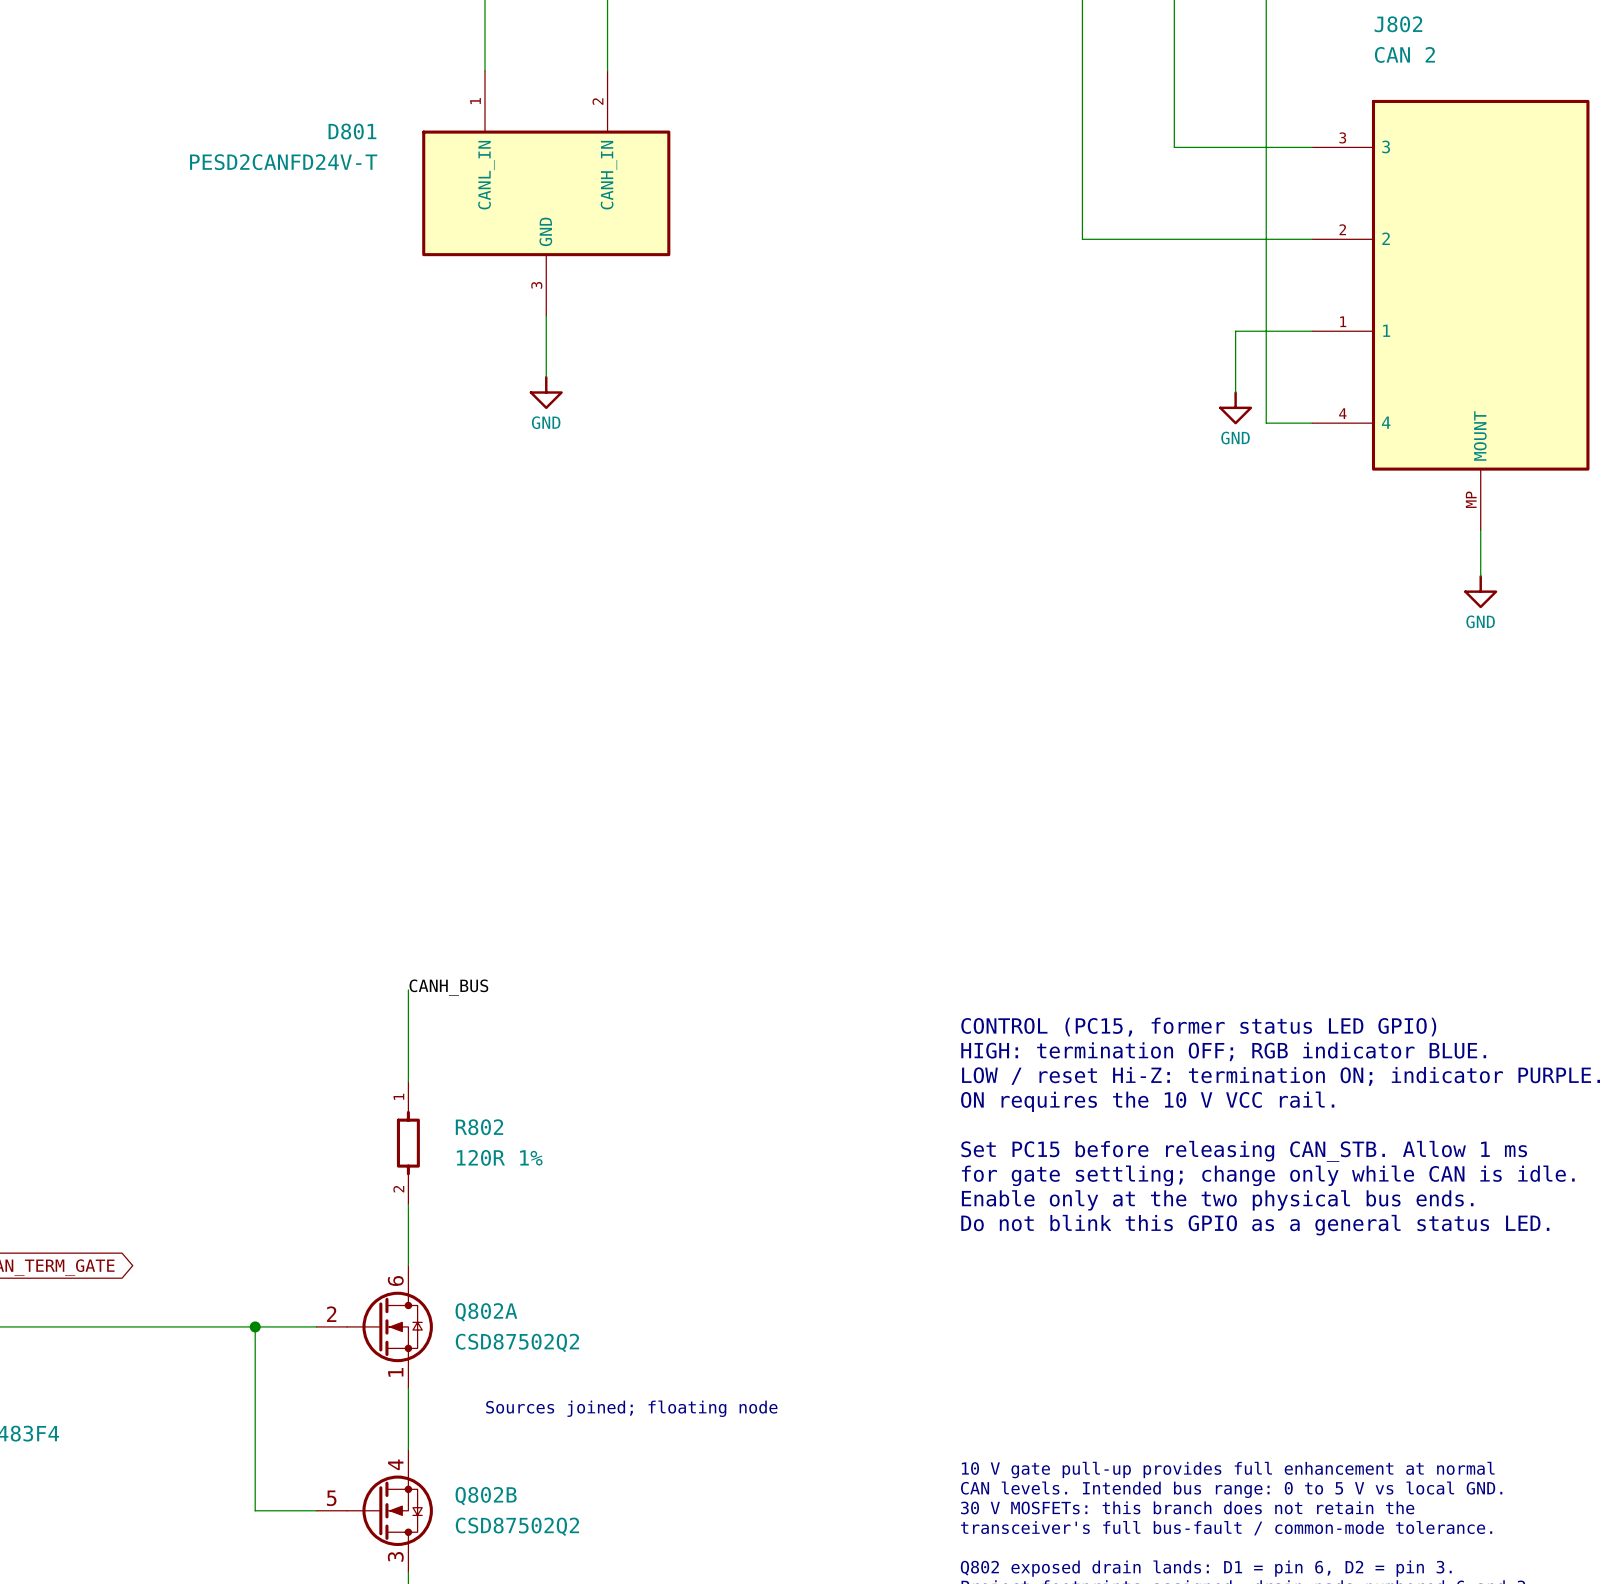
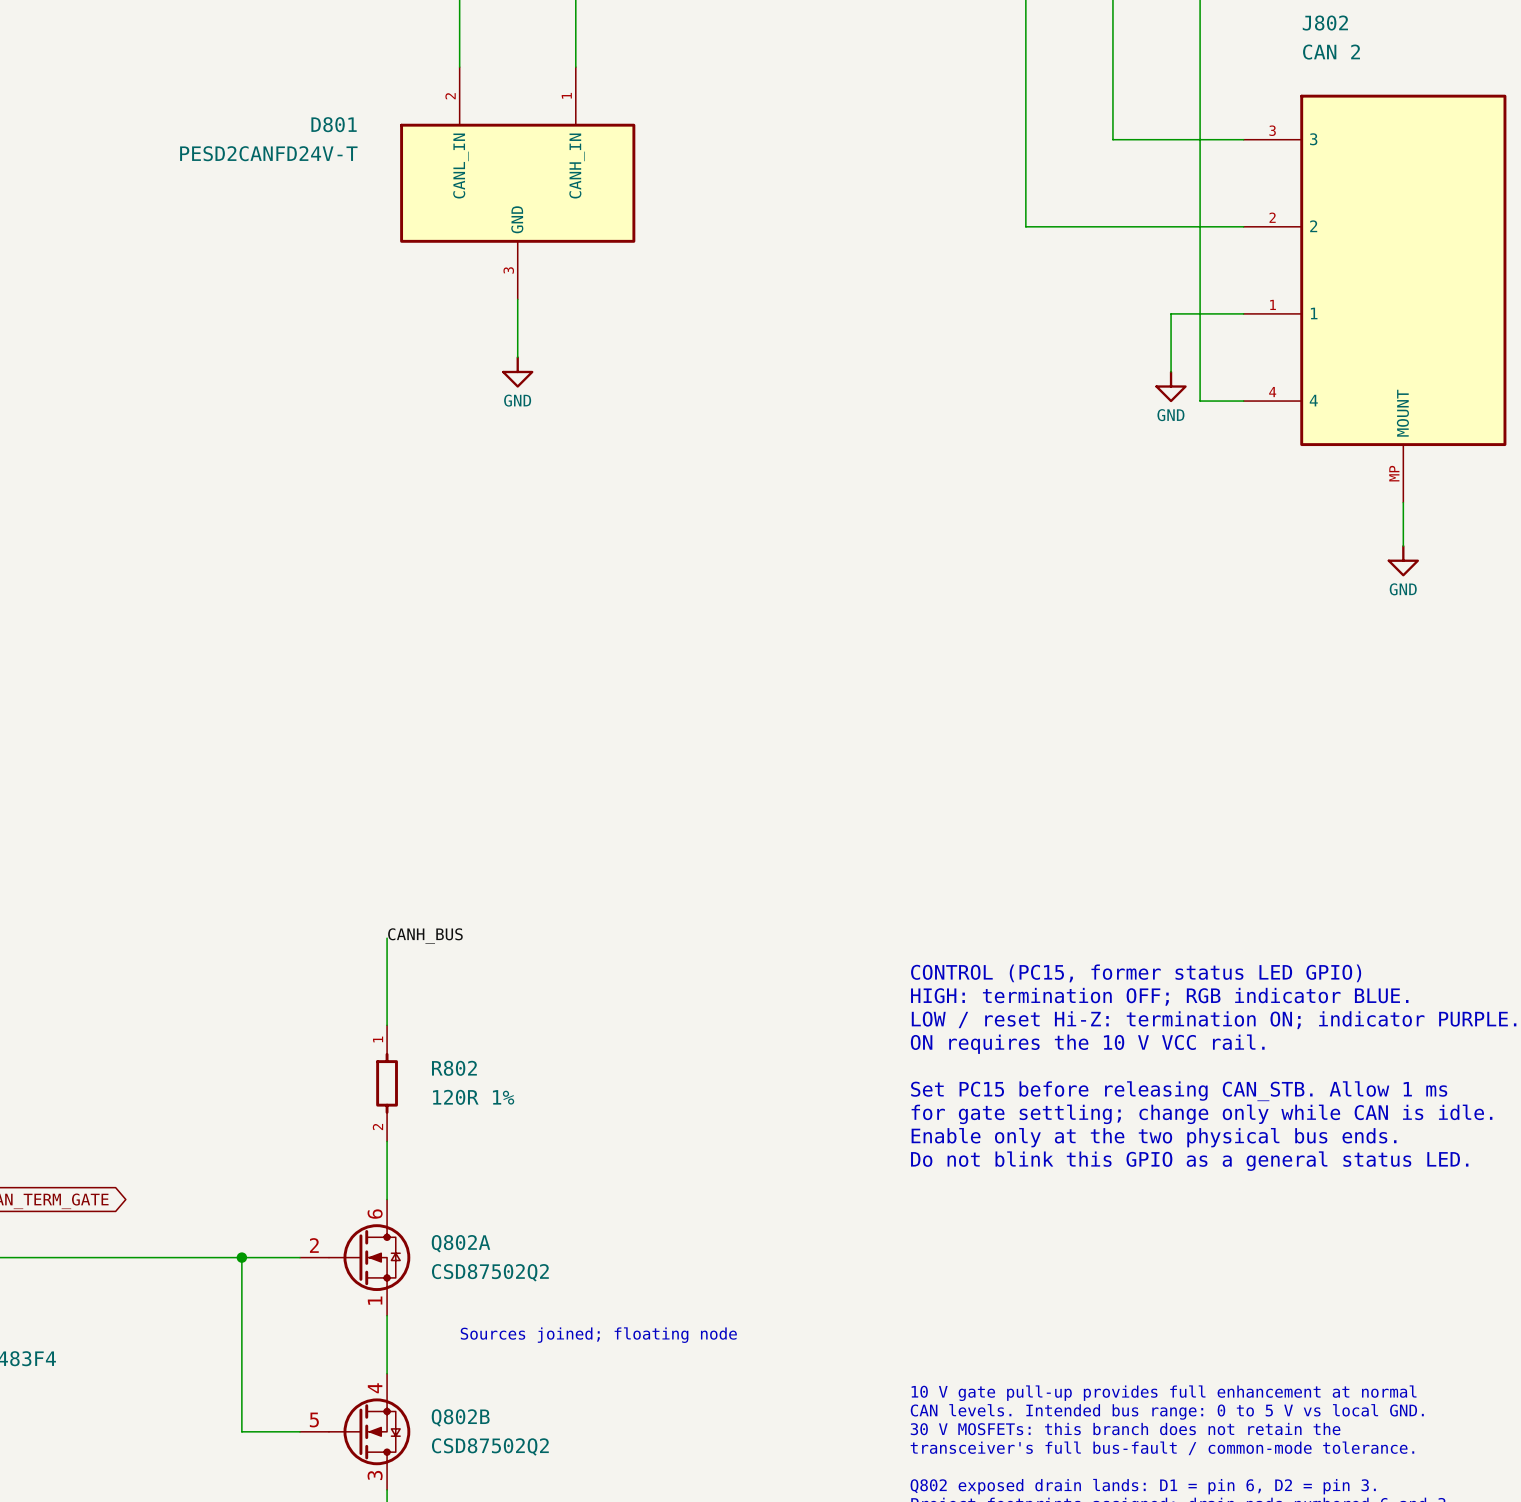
D801 pin number: 1 (475, 101) -> 2 (450, 96)
D801 pin number: 2 (597, 101) -> 1 (566, 95)

